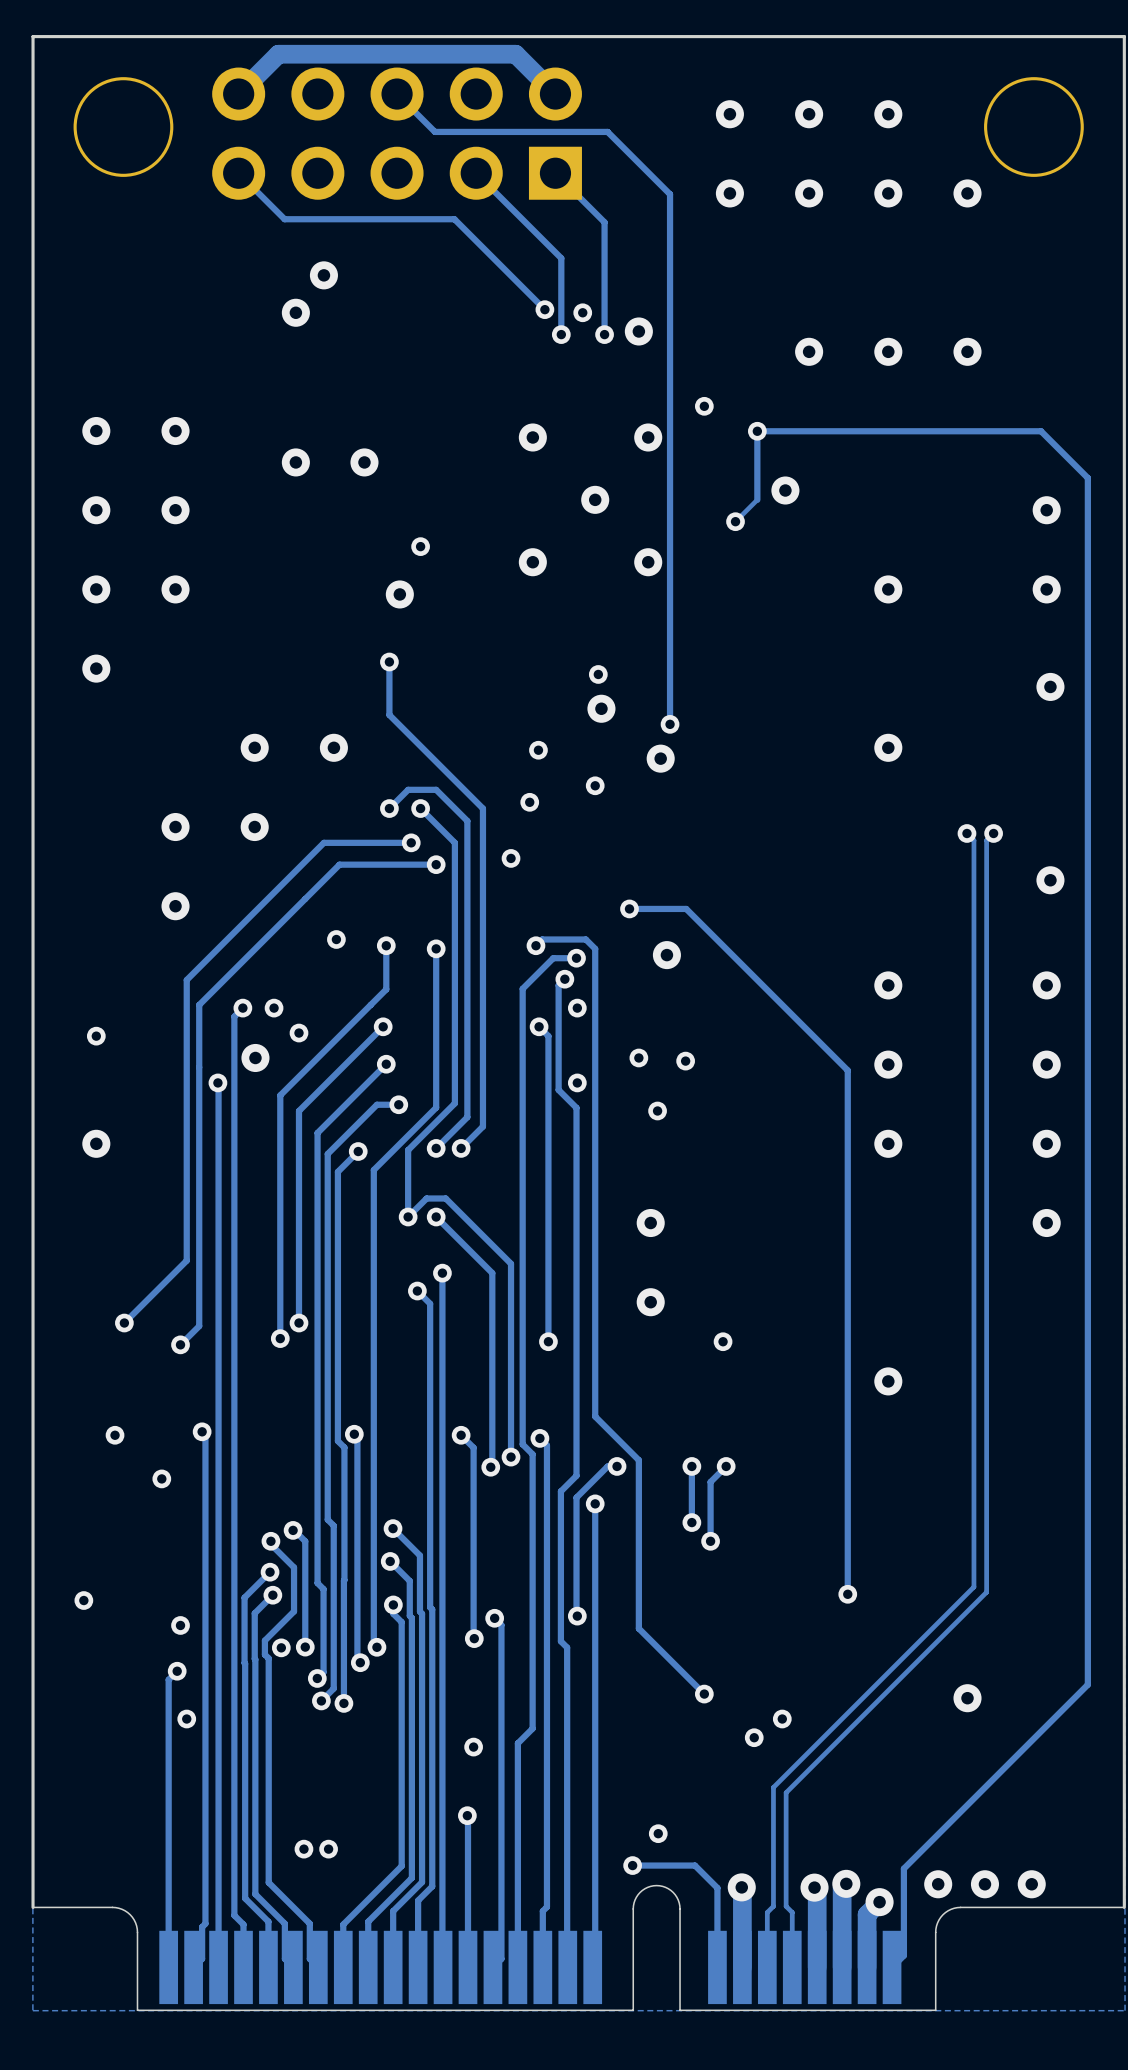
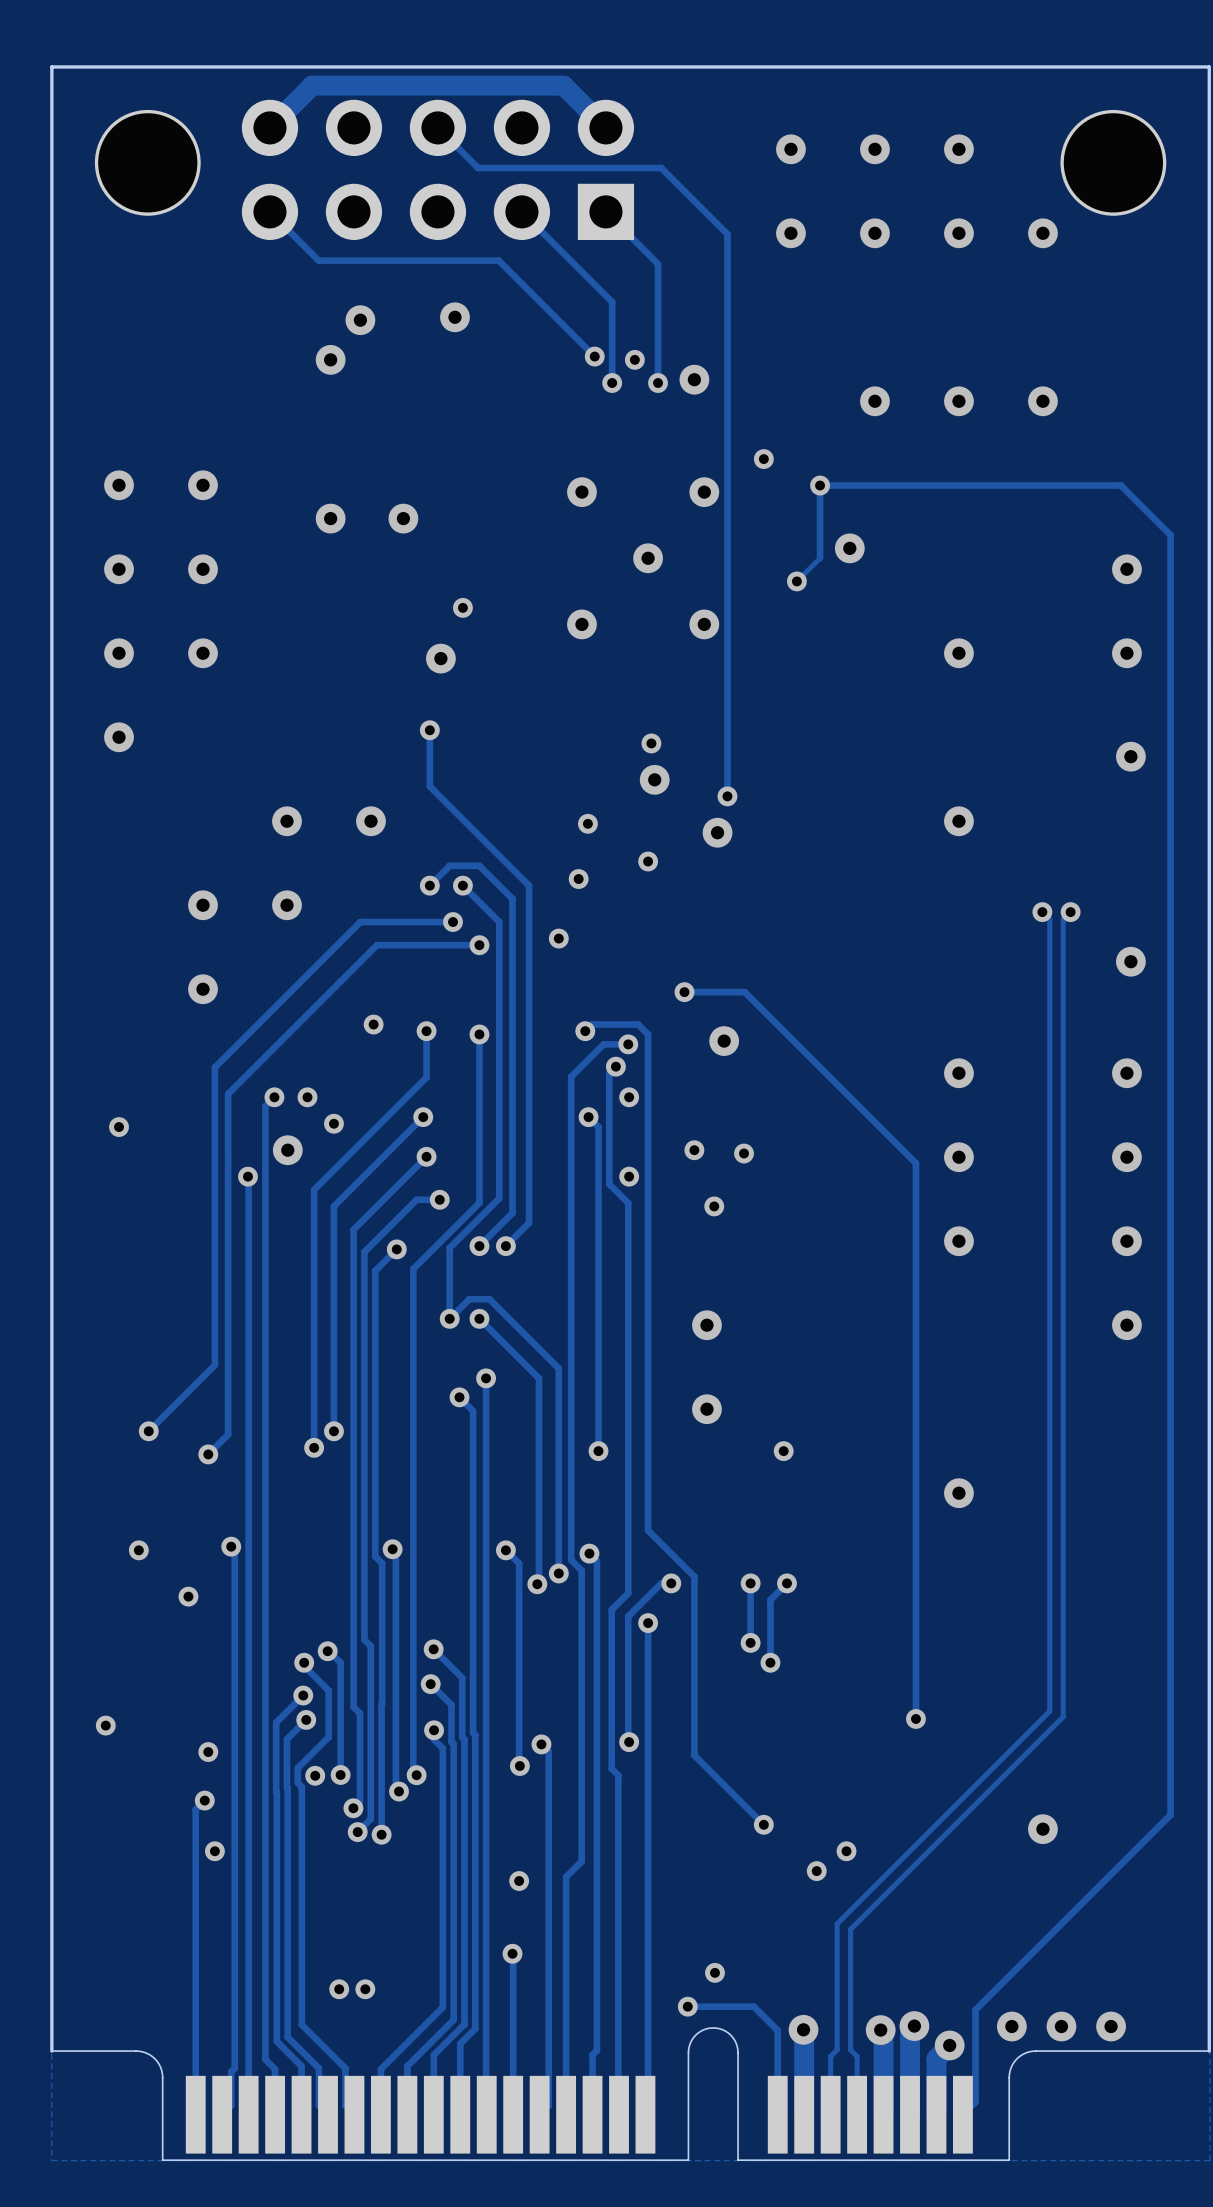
via: none -> (454, 317)
via: (96, 1143) -> none

